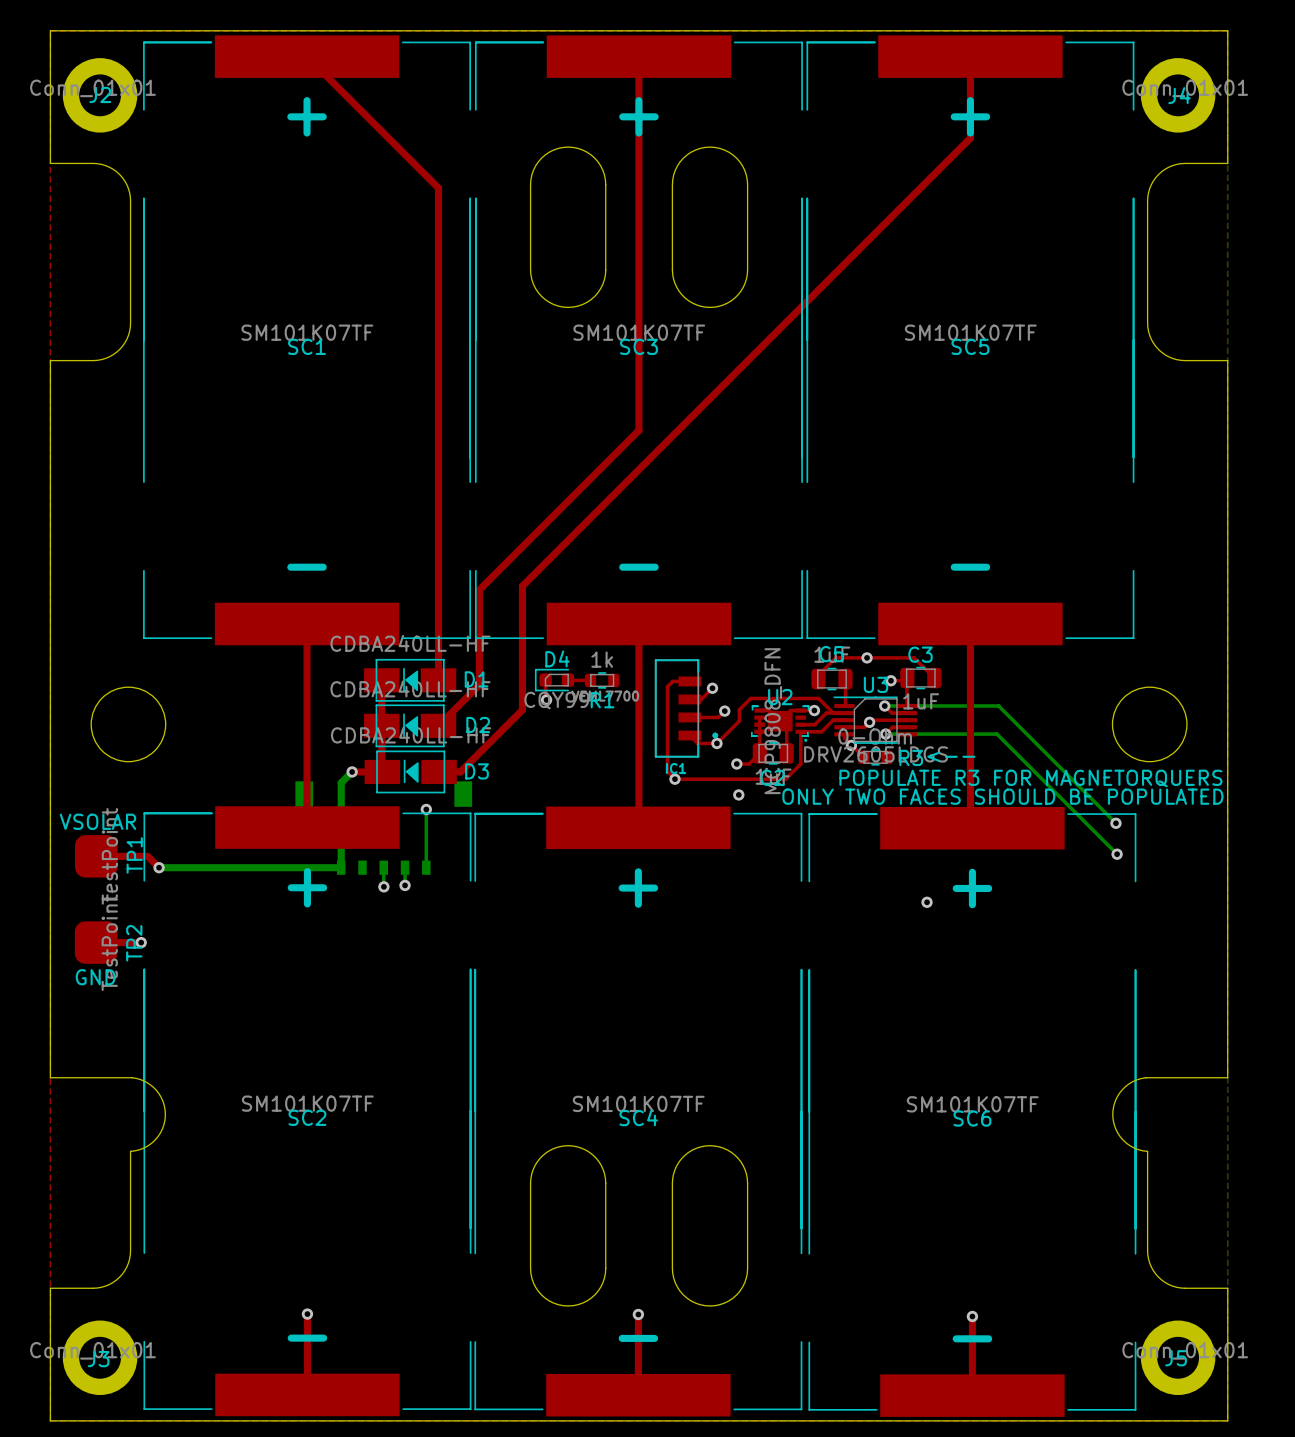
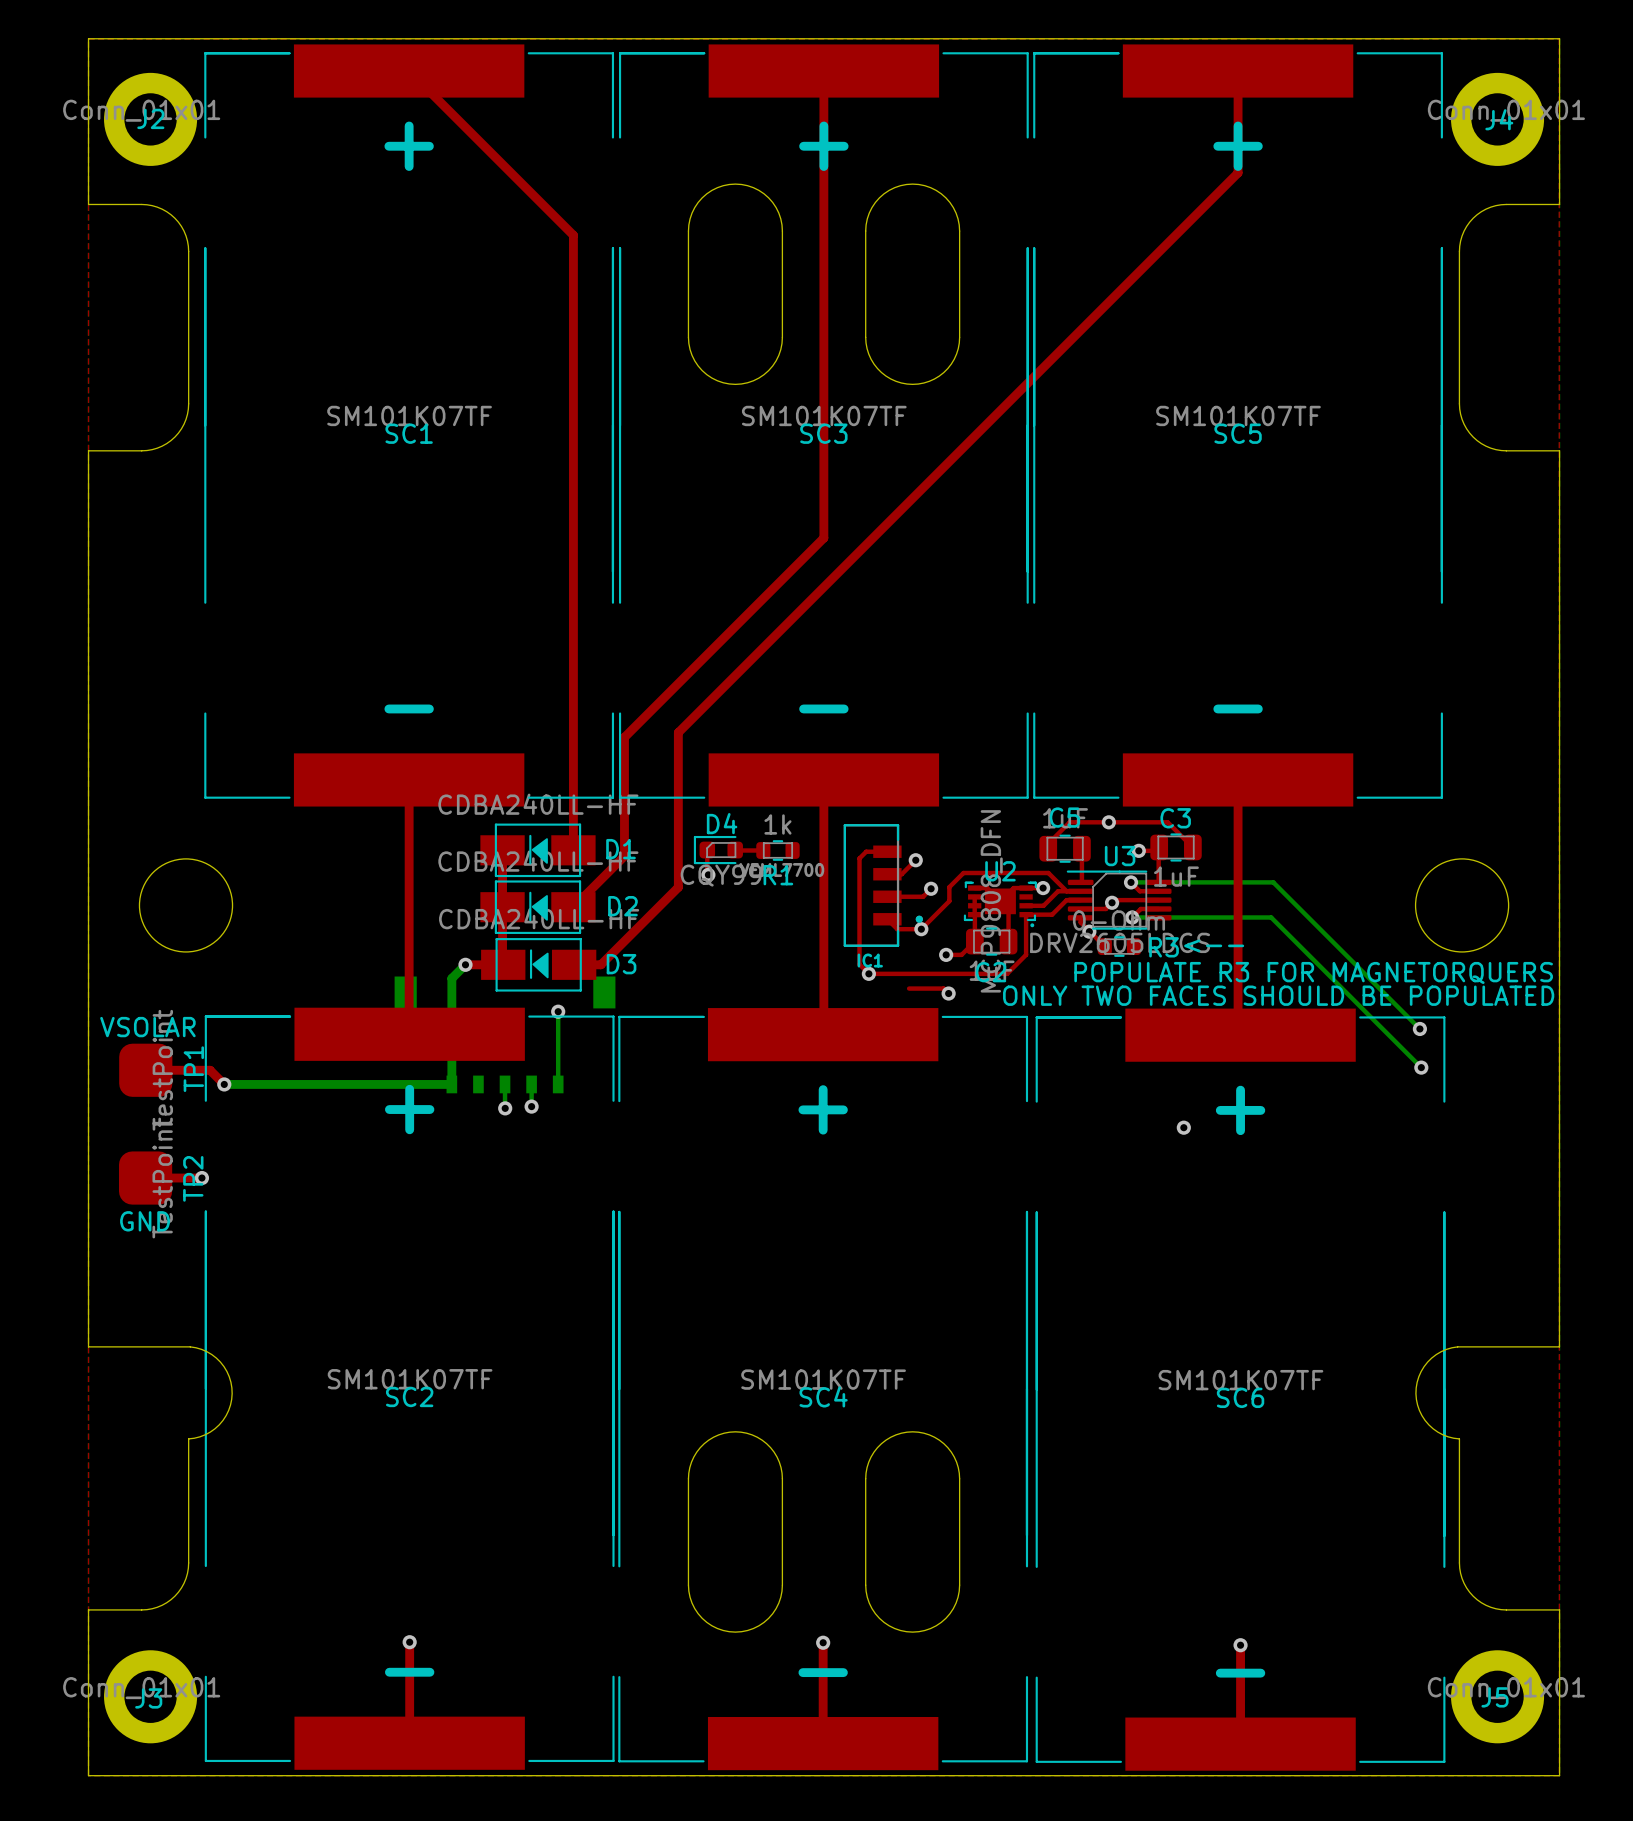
top track: none -> (909, 988) (943, 988) (948, 993)

